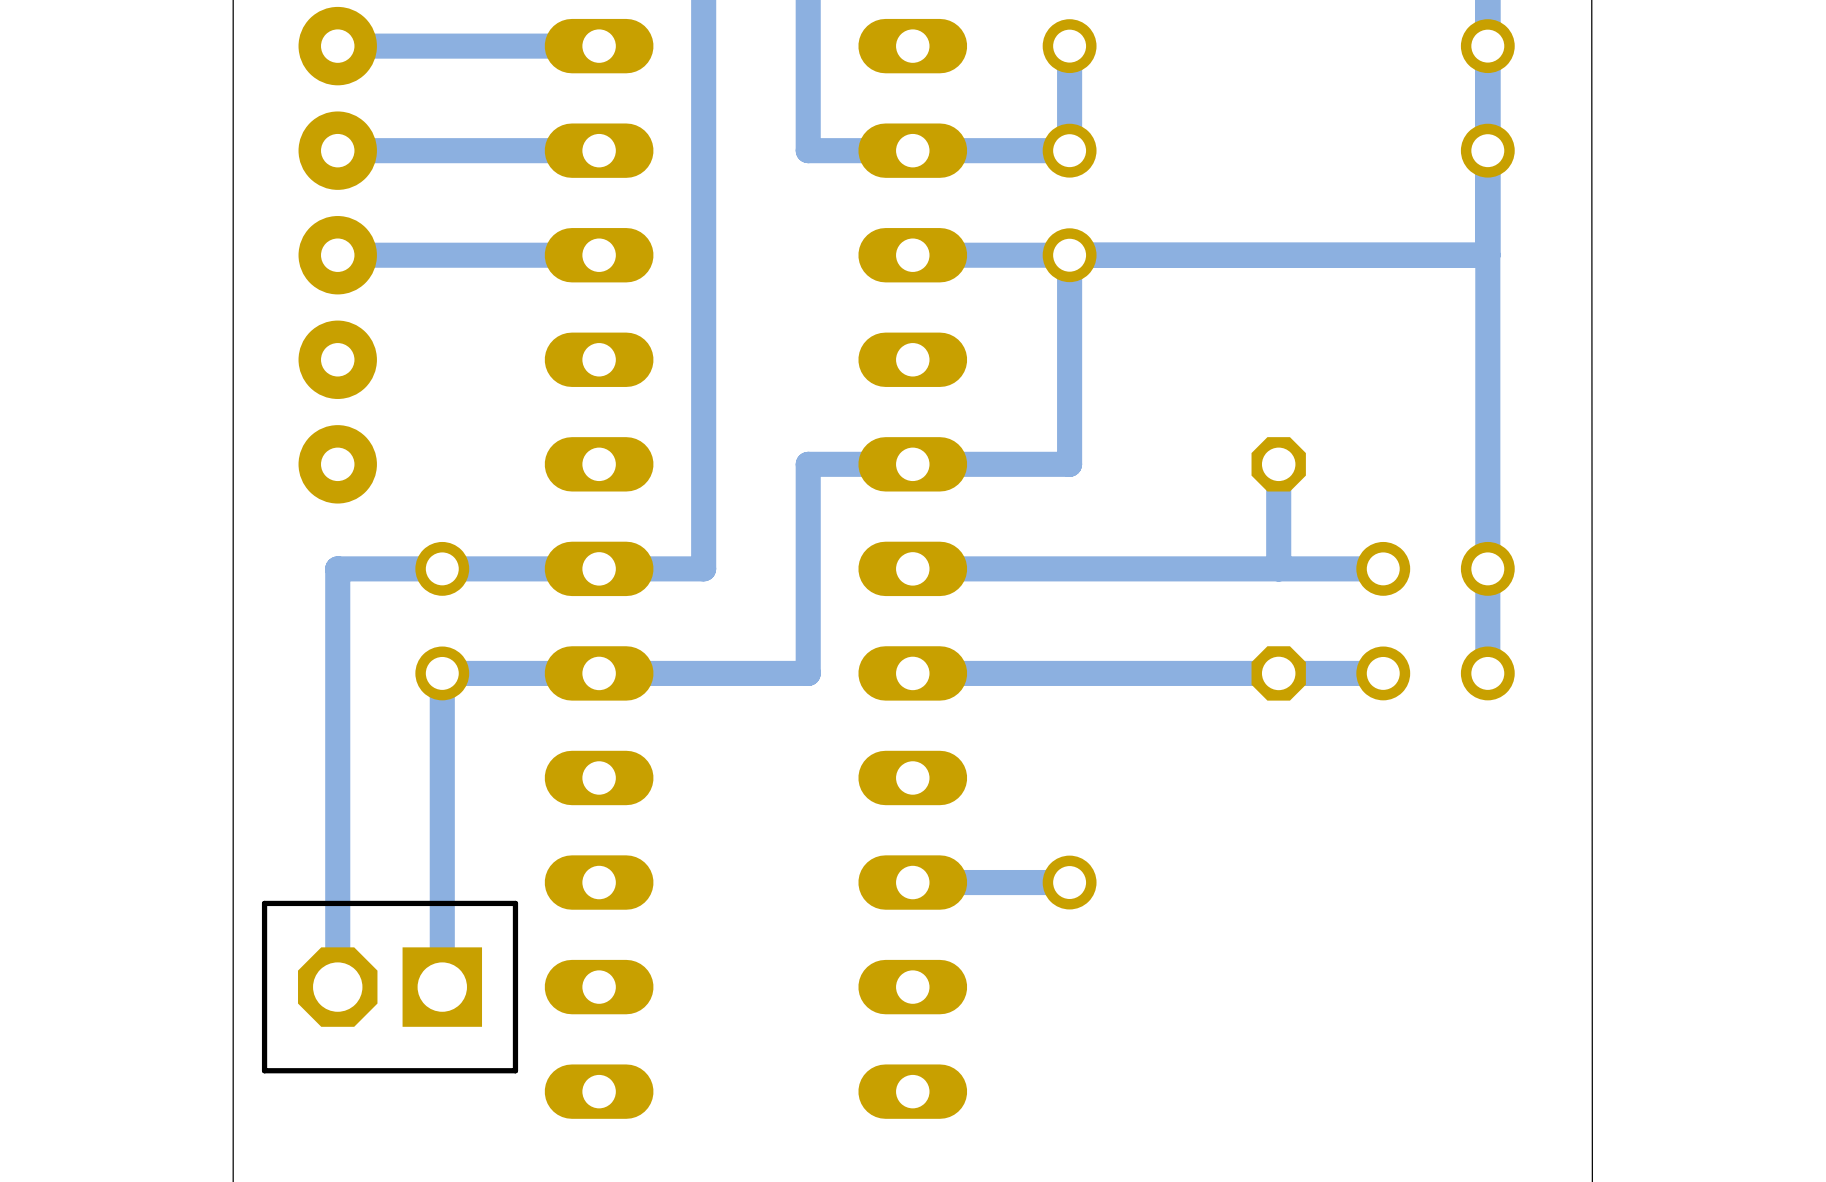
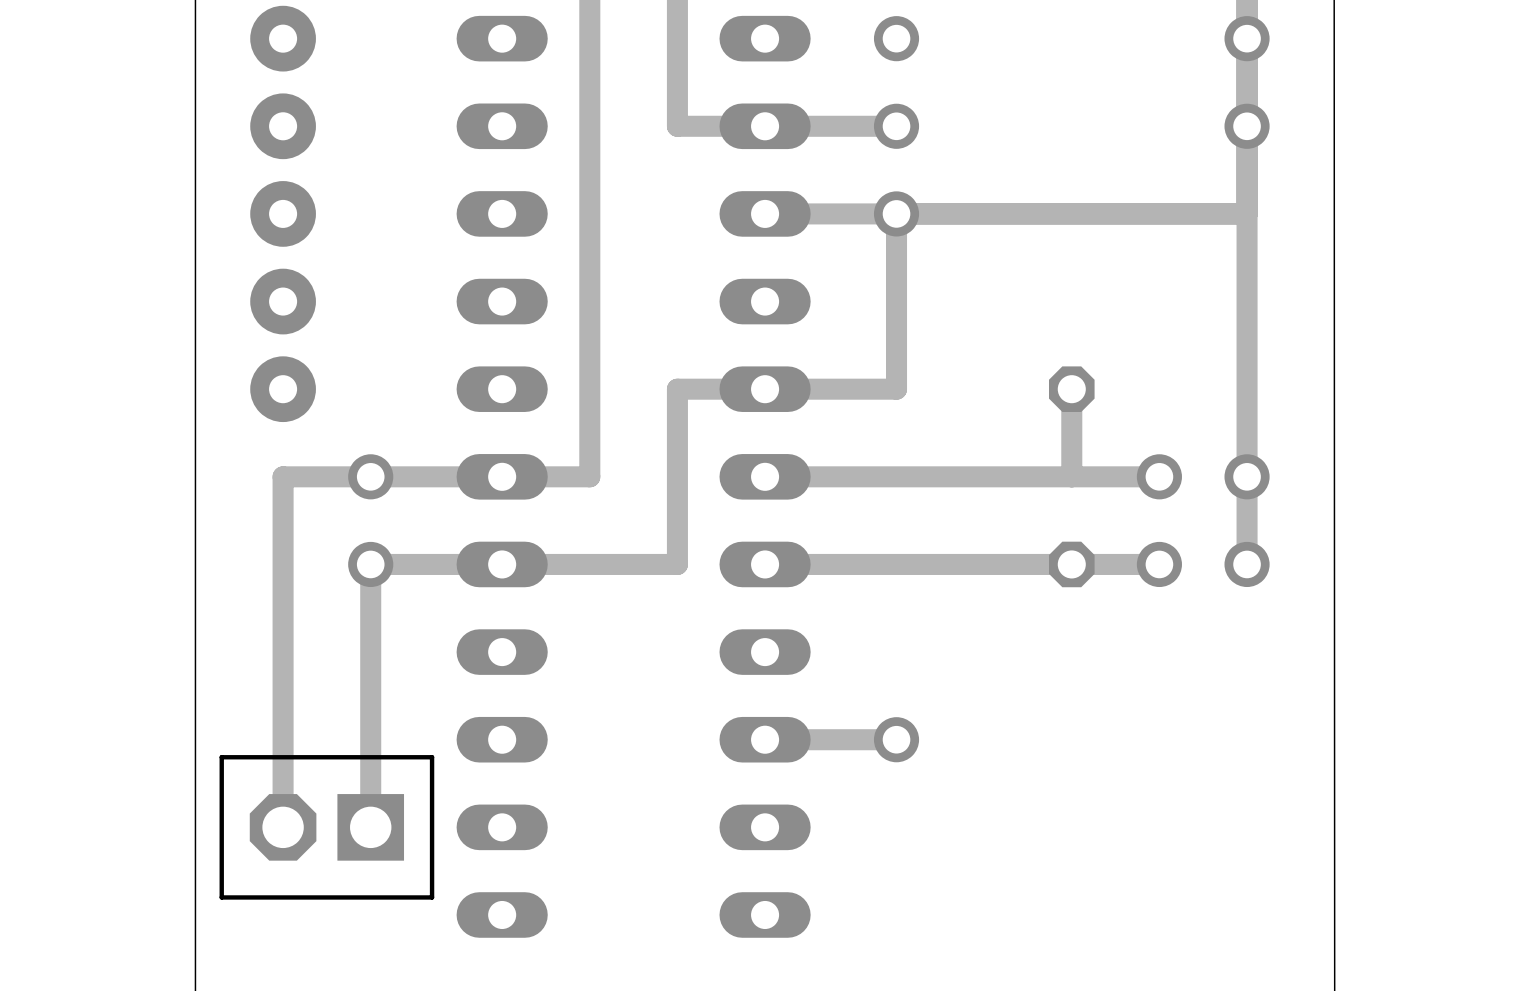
track: (599, 46) (337, 46) -> none
track: (1069, 46) (1069, 150) -> none
track: (599, 150) (337, 150) -> none
track: (599, 255) (337, 255) -> none

